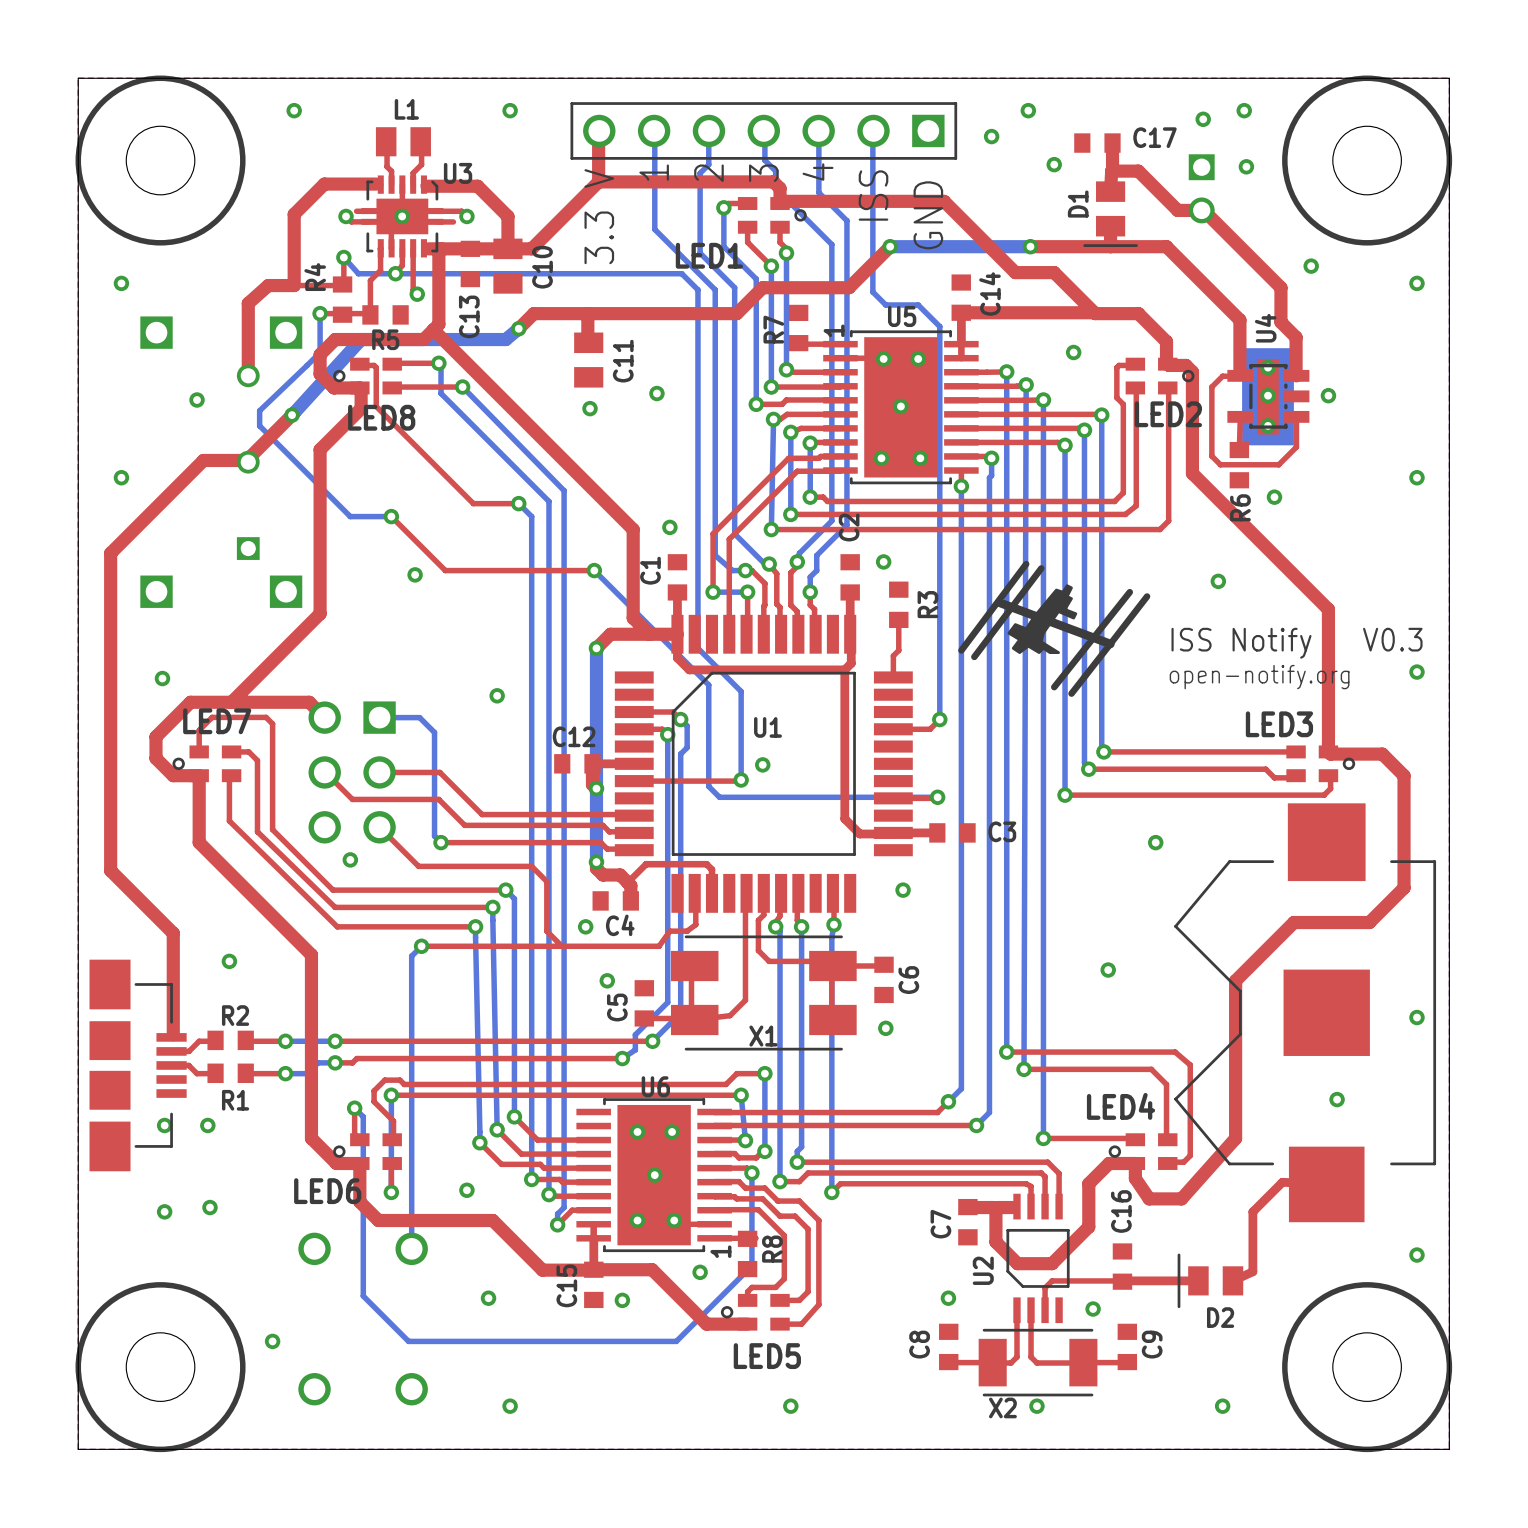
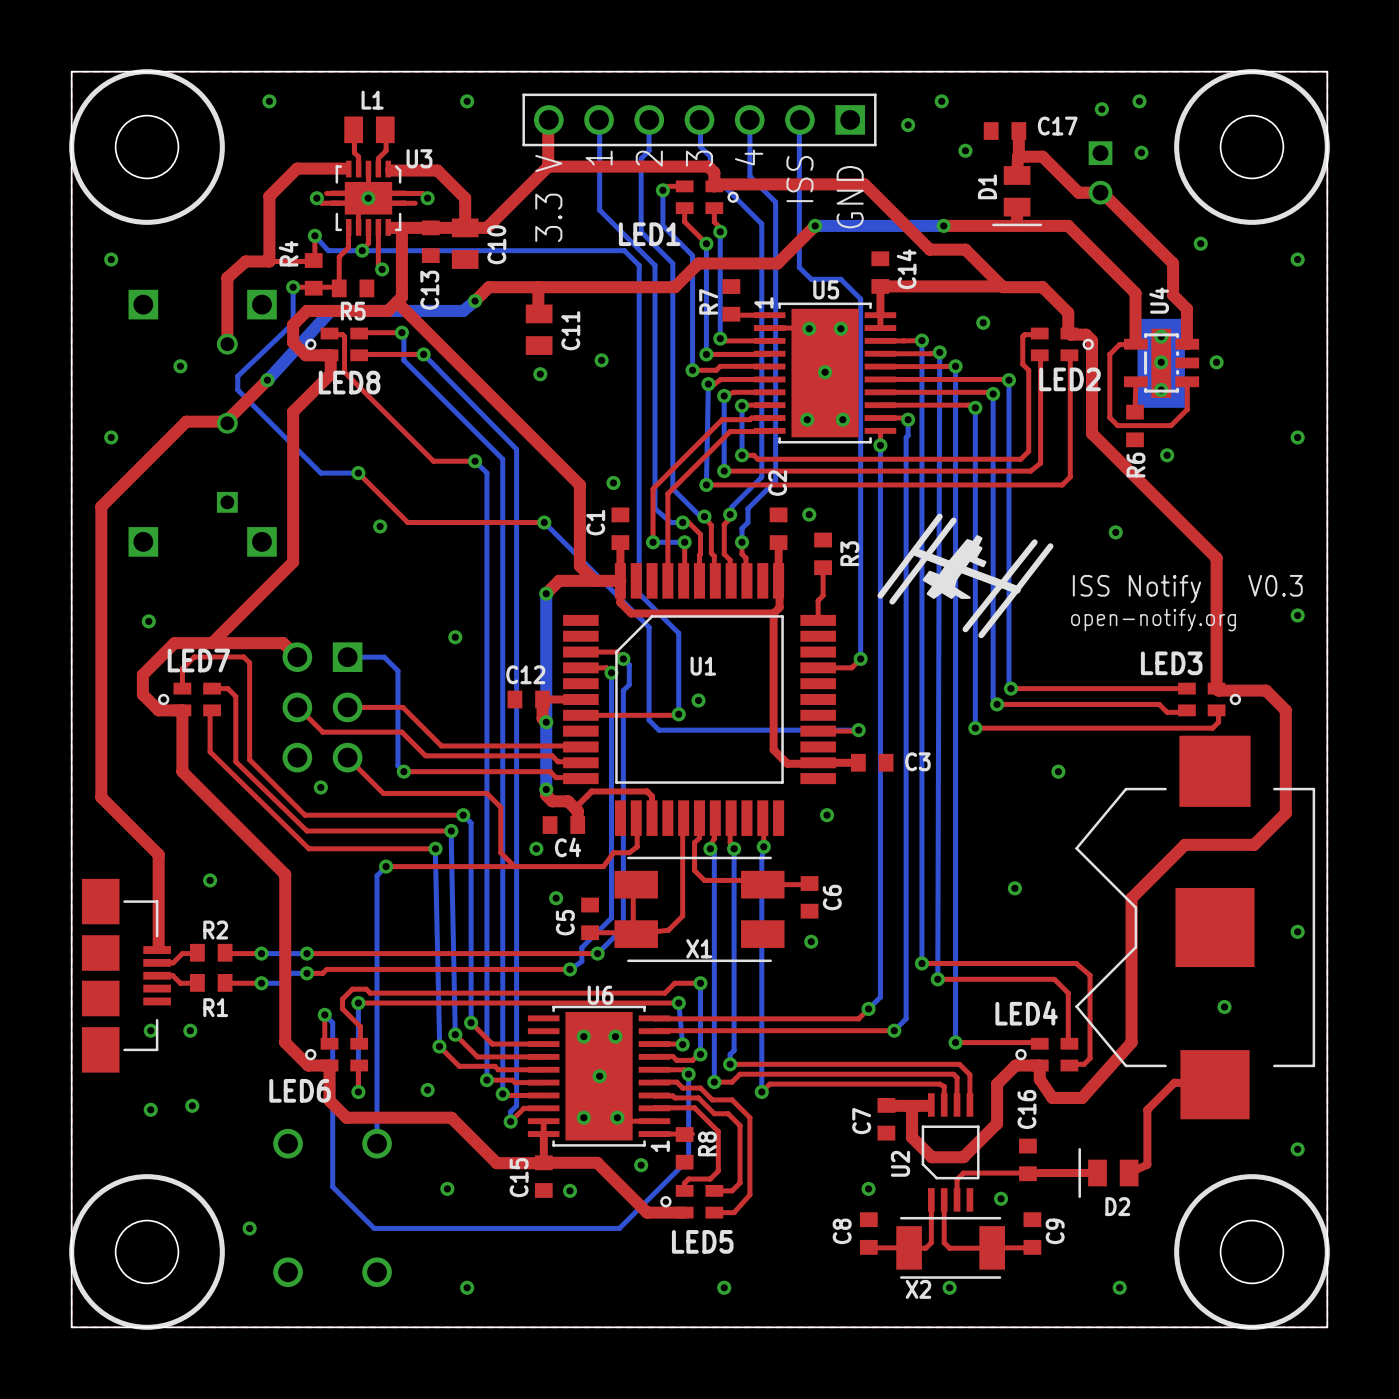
top track: (831, 965) (831, 1021) -> none

